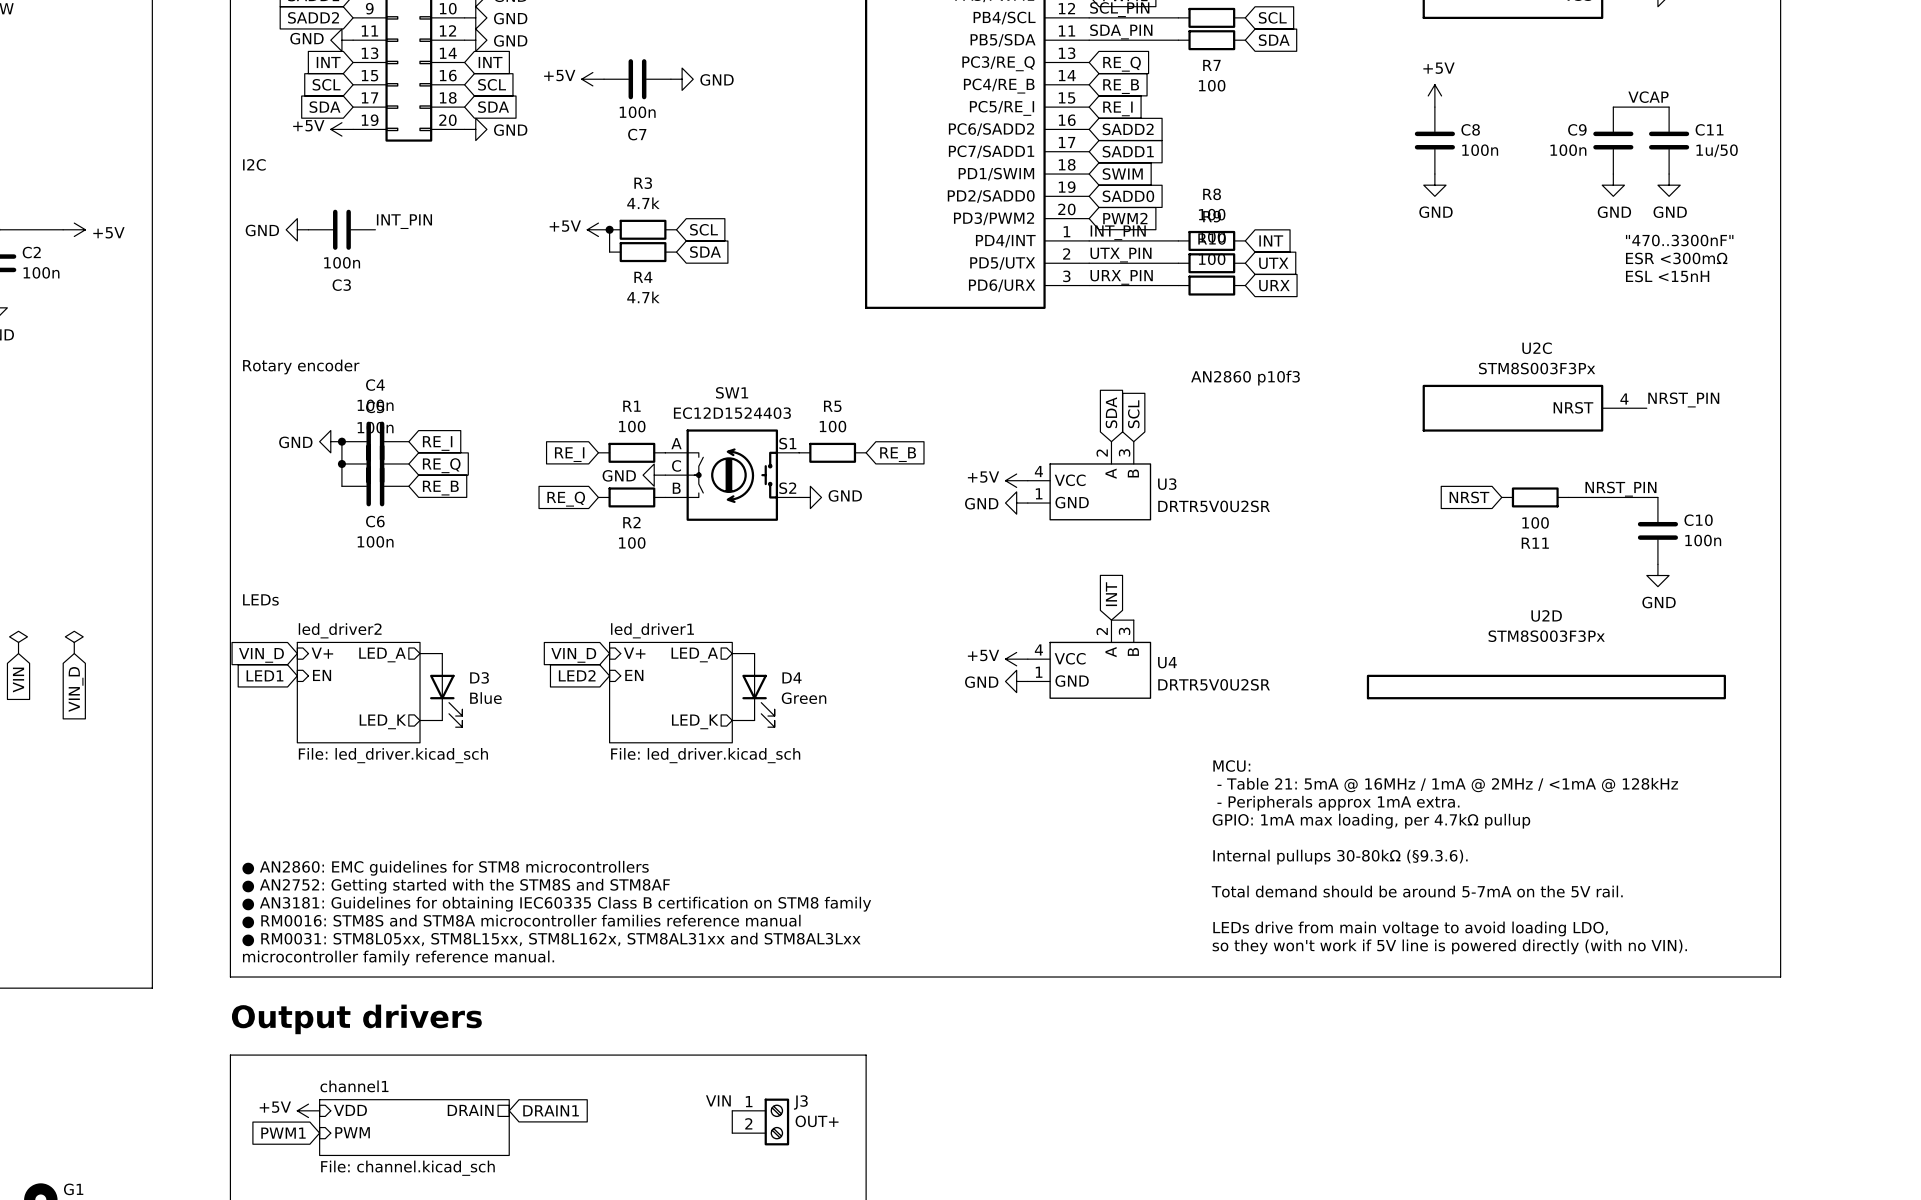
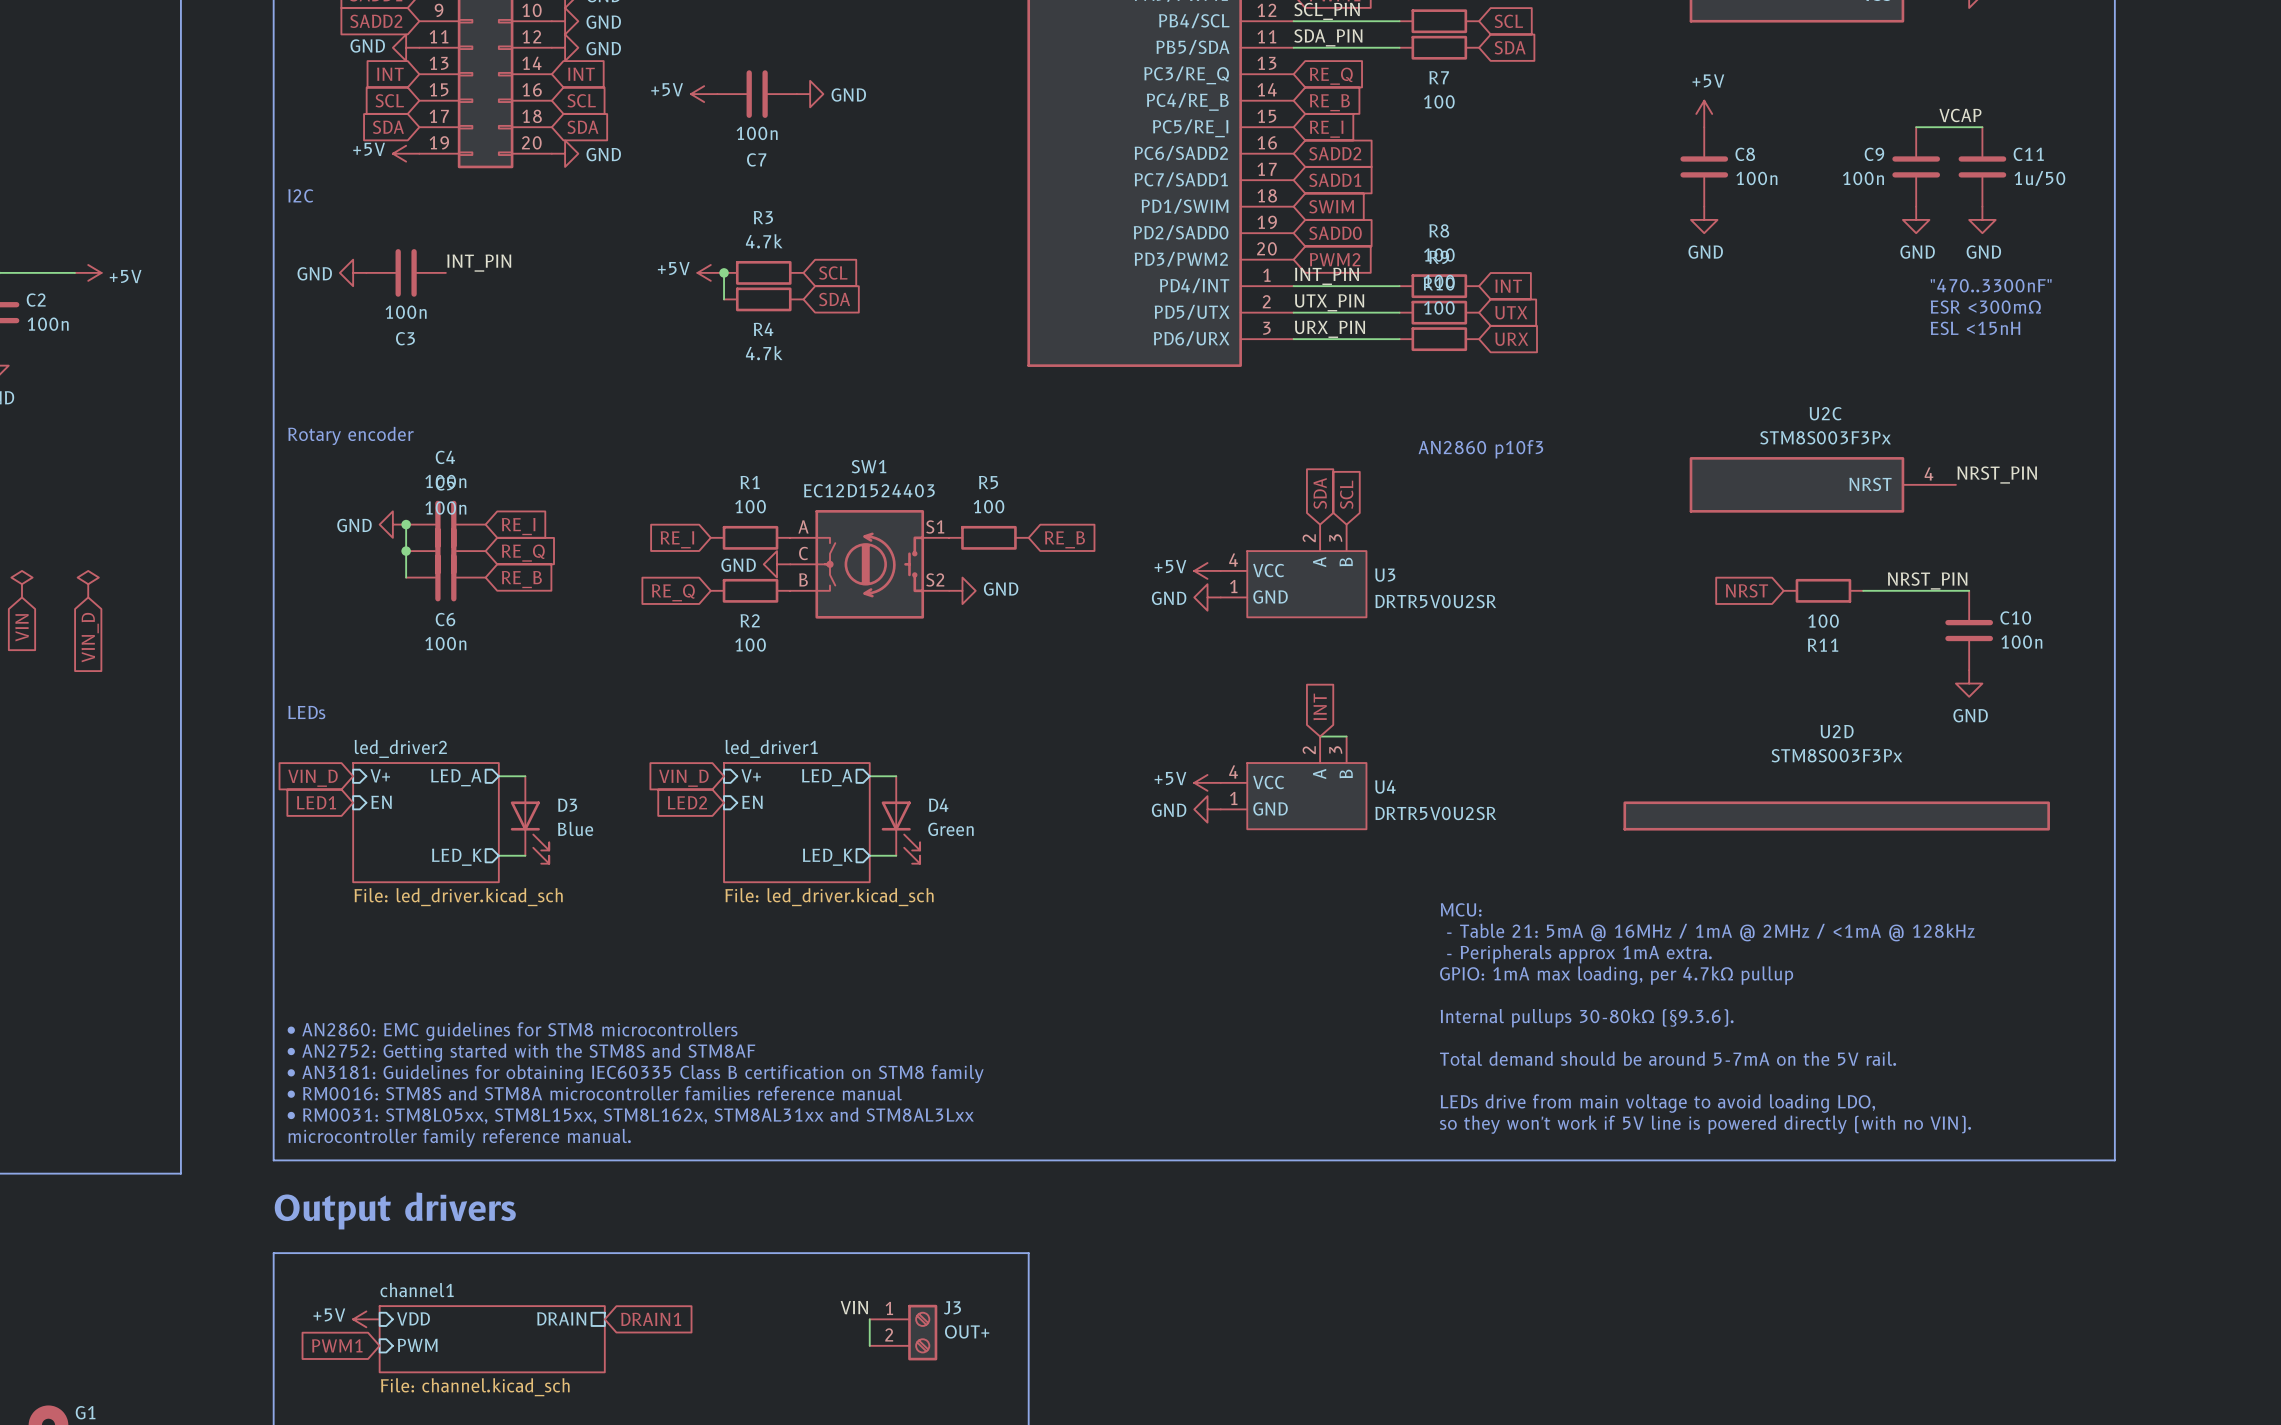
power symbol: none -> (21, 584)
power symbol: none -> (88, 584)
power symbol: (18, 642) -> none
power symbol: (74, 642) -> none
global label position: VIN (18, 680) -> VIN (22, 627)
global label position: VIN_D (76, 689) -> VIN_D (90, 637)

